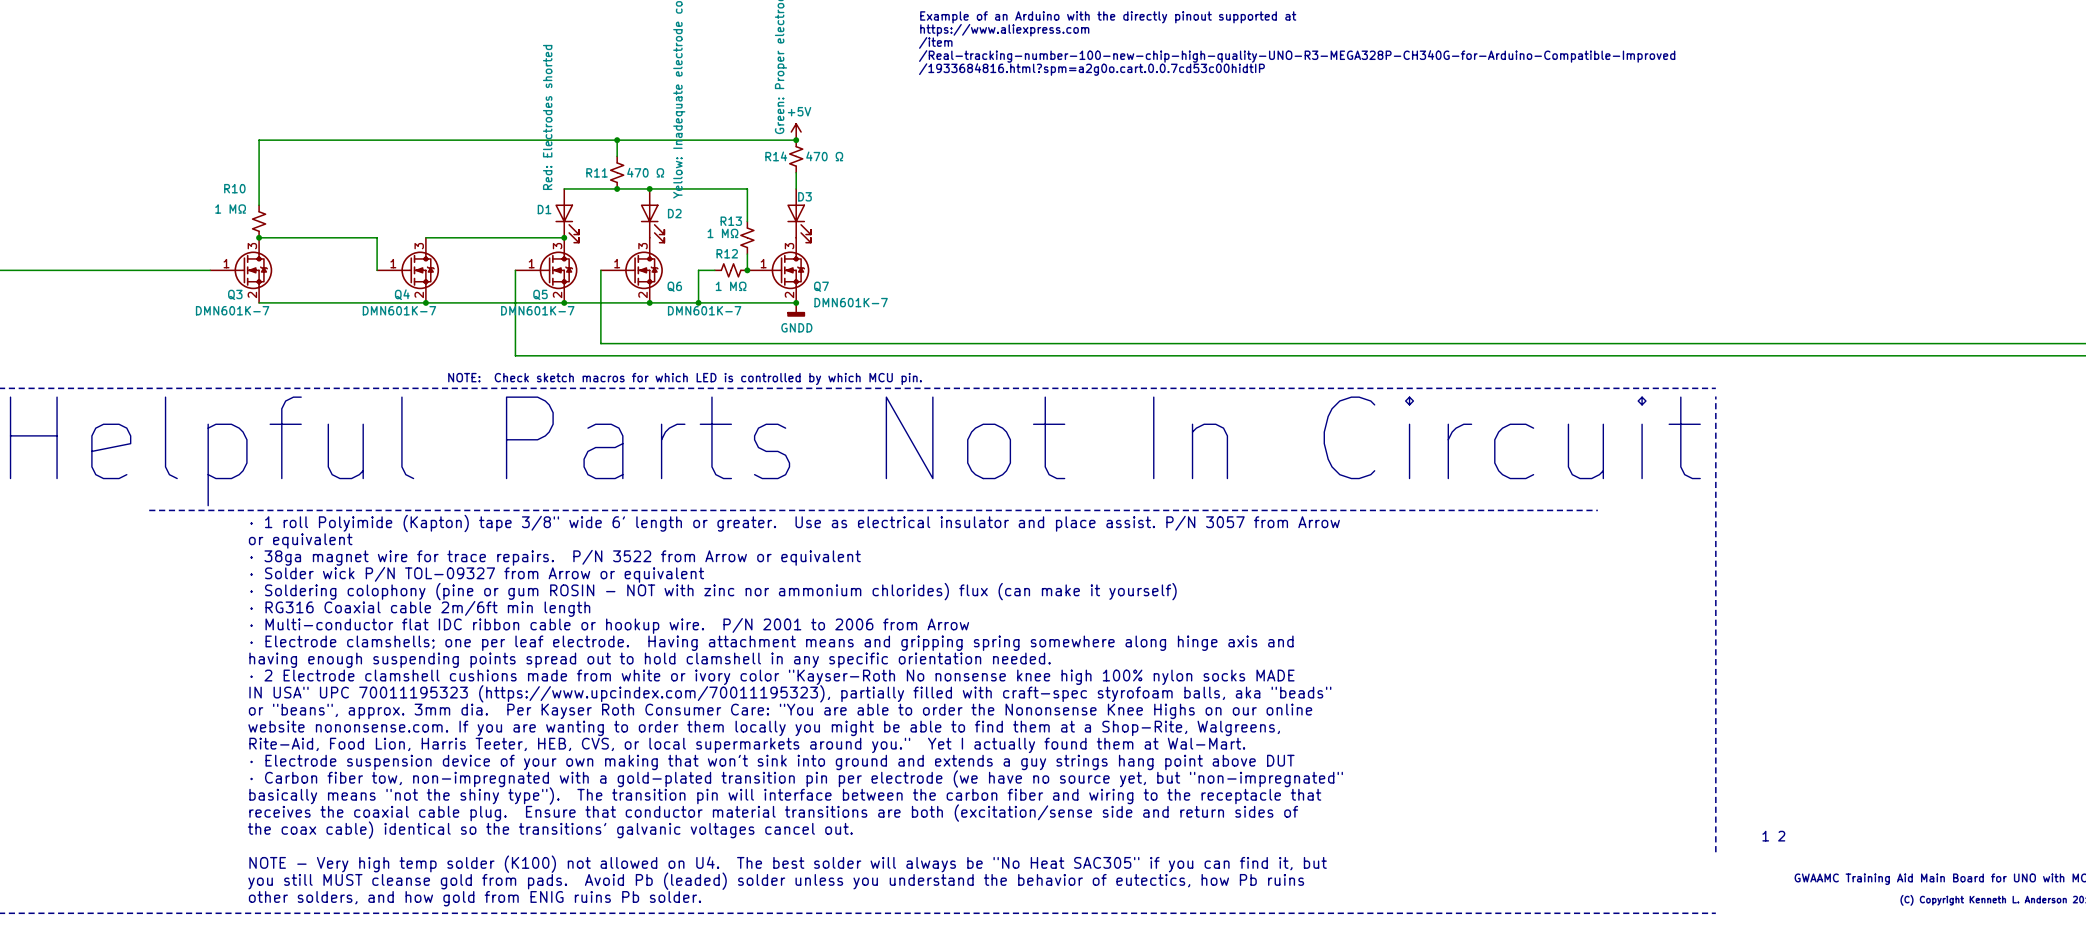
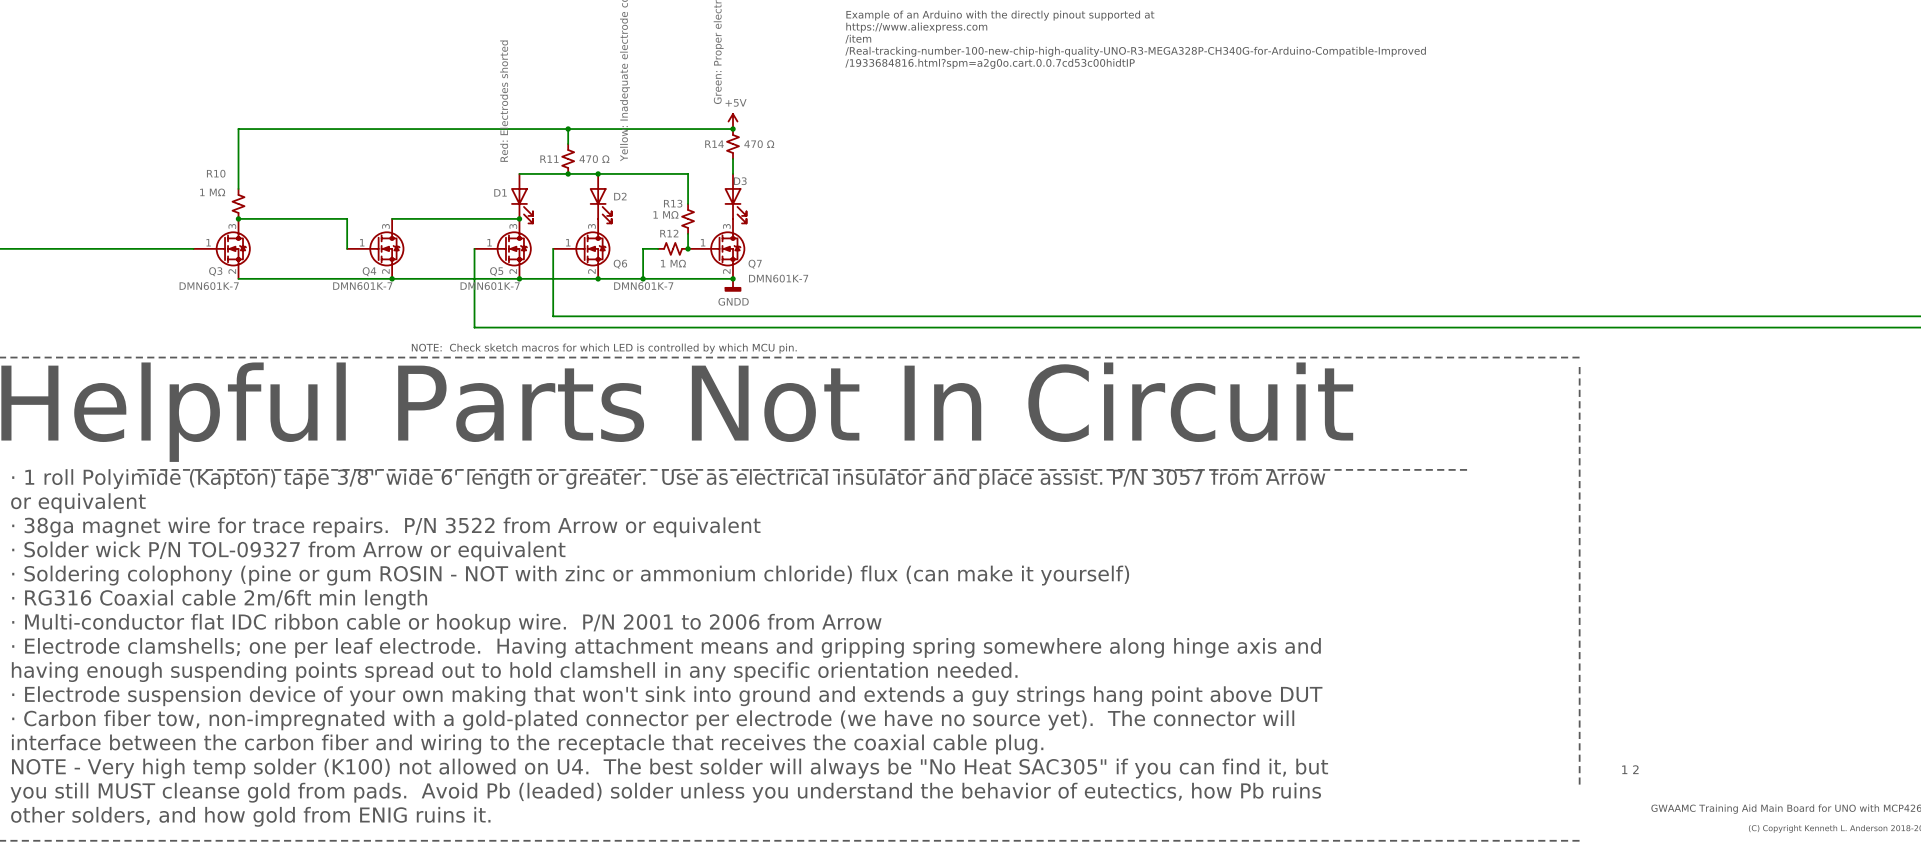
text: none -> · 1 roll Polyimide (Kapton) tape 3/8" wide 6' length or greater. Use as electrical insulator and place assist. P/N 3057 from Arrow (668, 479)
text: · 1 roll Polyimide (Kapton) tape 3/8" wide 6' length or greater. Use as electrical insulator and place assist. P/N 3057 from Arrow (795, 523) -> none
text: or equivalent (300, 541) -> none
text: none -> or equivalent (78, 503)
text: · 38ga magnet wire for trace repairs. P/N 3522 from Arrow or equivalent (555, 557) -> none
text: none -> · 38ga magnet wire for trace repairs. P/N 3522 from Arrow or equivalent (386, 527)
text: · Solder wick P/N TOL-09327 from Arrow or equivalent (477, 574) -> none
text: · Soldering colophony (pine or gum ROSIN - NOT with zinc nor ammonium chlorides) flux (can make it yourself) (713, 591) -> none
text: none -> · Solder wick P/N TOL-09327 from Arrow or equivalent (288, 551)
text: · RG316 Coaxial cable 2m/6ft min length (420, 608) -> none
text: · Multi-conductor flat IDC ribbon cable or hookup wire. P/N 2001 to 2006 from Arrow (609, 625) -> none
text: none -> · Soldering colophony (pine or gum ROSIN - NOT with zinc or ammonium chloride) flux (can make it yourself) (570, 575)
text: · Electrode clamshells; one per leaf electrode. Having attachment means and gripping spring somewhere along hinge axis and (771, 643) -> none
text: none -> · RG316 Coaxial cable 2m/6ft min length (219, 599)
text: having enough suspending points spread out to hold clamshell in any specific orientation needed. (650, 660) -> none
text: none -> · Multi-conductor flat IDC ribbon cable or hookup wire. P/N 2001 to 2006 from Arrow (446, 623)
text: · 2 Electrode clamshell cushions made from white or ivory color "Kayser-Roth No nonsense knee high 100% nylon socks MADE (772, 677) -> none
text: IN USA" UPC 70011195323 (https://www.upcindex.com/70011195323), partially filled with craft-spec styrofoam balls, aka "beads" (790, 693) -> none
text: none -> · Electrode clamshells; one per leaf electrode. Having attachment means and gripping spring somewhere along hinge axis and (666, 647)
text: or "beans", approx. 3mm dia. Per Kayser Roth Consumer Care: "You are able to order the Nononsense Knee Highs on our online (780, 711) -> none
text: website nononsense.com. If you are wanting to order them locally you might be able to find them at a Shop-Rite, Walgreens, (764, 728) -> none
text: none -> having enough suspending points spread out to hold clamshell in any specific orientation needed. (514, 672)
text: Rite-Aid, Food Lion, Harris Teeter, HEB, CVS, or local supermarkets around you." Yet I actually found them at Wal-Mart. (747, 745) -> none
text: none -> · Electrode suspension device of your own making that won't sink into ground and extends a guy strings hang point above DUT (667, 696)
text: · Electrode suspension device of your own making that won't sink into ground and extends a guy strings hang point above DUT (772, 762) -> none
text: · Carbon fiber tow, non-impregnated with a gold-plated transition pin per electrode (we have no source yet, but "non-impregnated" (796, 778) -> none
text: none -> · Carbon fiber tow, non-impregnated with a gold-plated connector per electrode (we have no source yet). The connector will (653, 720)
text: basically means "not the shiny type"). The transition pin will interface between the carbon fiber and wiring to the receptacle that (785, 796) -> none
text: none -> interface between the carbon fiber and wiring to the receptacle that receives the coaxial cable plug. (527, 744)
text: receives the coaxial cable plug. Ensure that conductor material transitions are both (excitation/sense side and return sides of (773, 813) -> none
text: the coax cable) identical so the transitions' galvanic voltages cancel out. (550, 830) -> none
text: none -> NOTE - Very high temp solder (K100) not allowed on U4. The best solder will always be "No Heat SAC305" if you can find it, but (670, 768)
text: none -> you still MUST cleanse gold from pads. Avoid Pb (leaded) solder unless you understand the behavior of eutectics, how Pb ruins (665, 792)
text: NOTE - Very high temp solder (K100) not allowed on U4. The best solder will always be "No Heat SAC305" if you can find it, but (788, 864) -> none
text: you still MUST cleanse gold from pads. Avoid Pb (leaded) solder unless you understand the behavior of eutectics, how Pb ruins (776, 881) -> none
text: none -> other solders, and how gold from ENIG ruins it. (250, 816)
text: other solders, and how gold from ENIG ruins Pb solder. (474, 898) -> none

